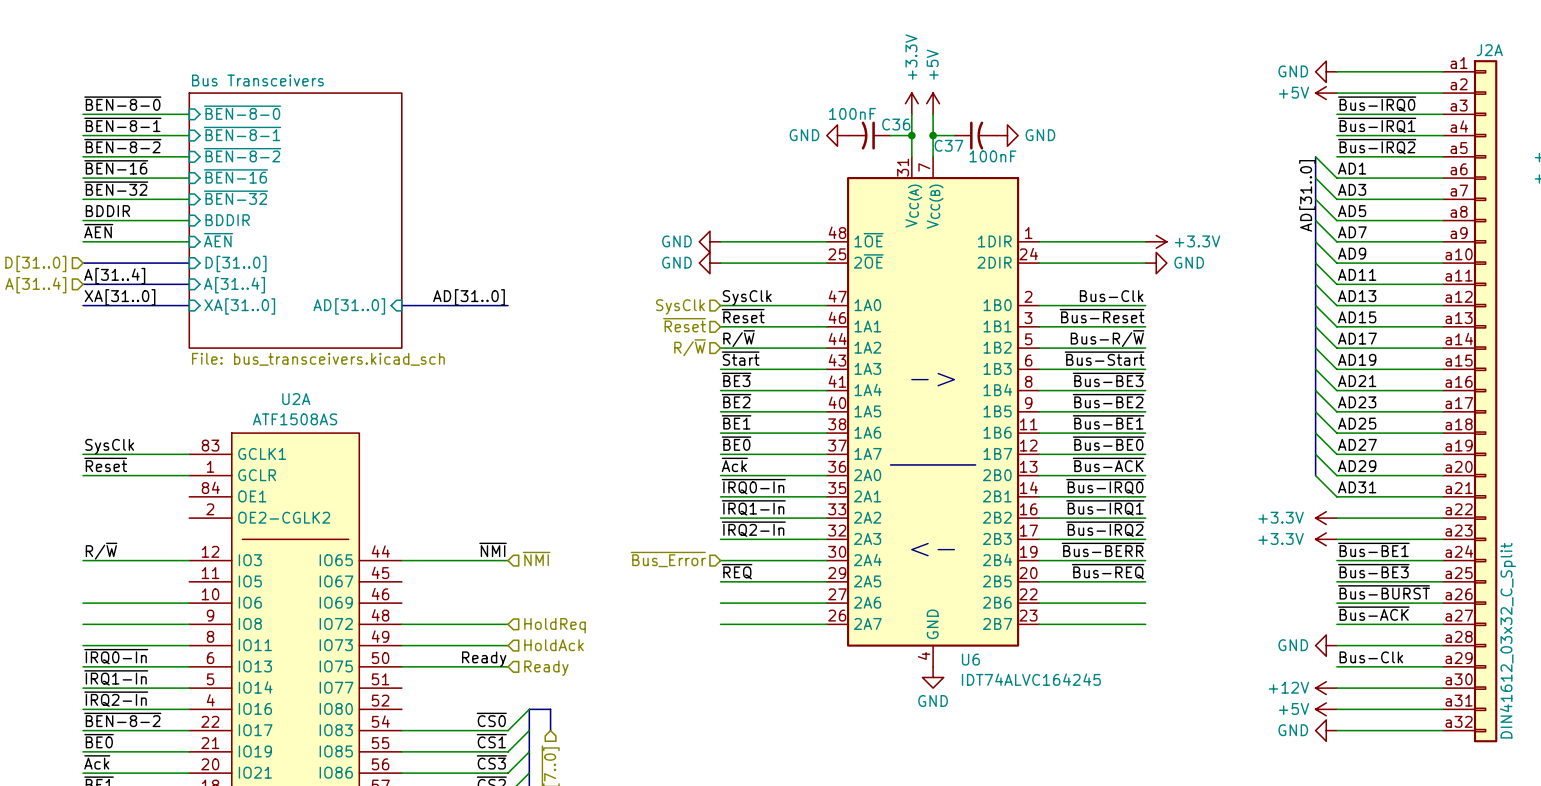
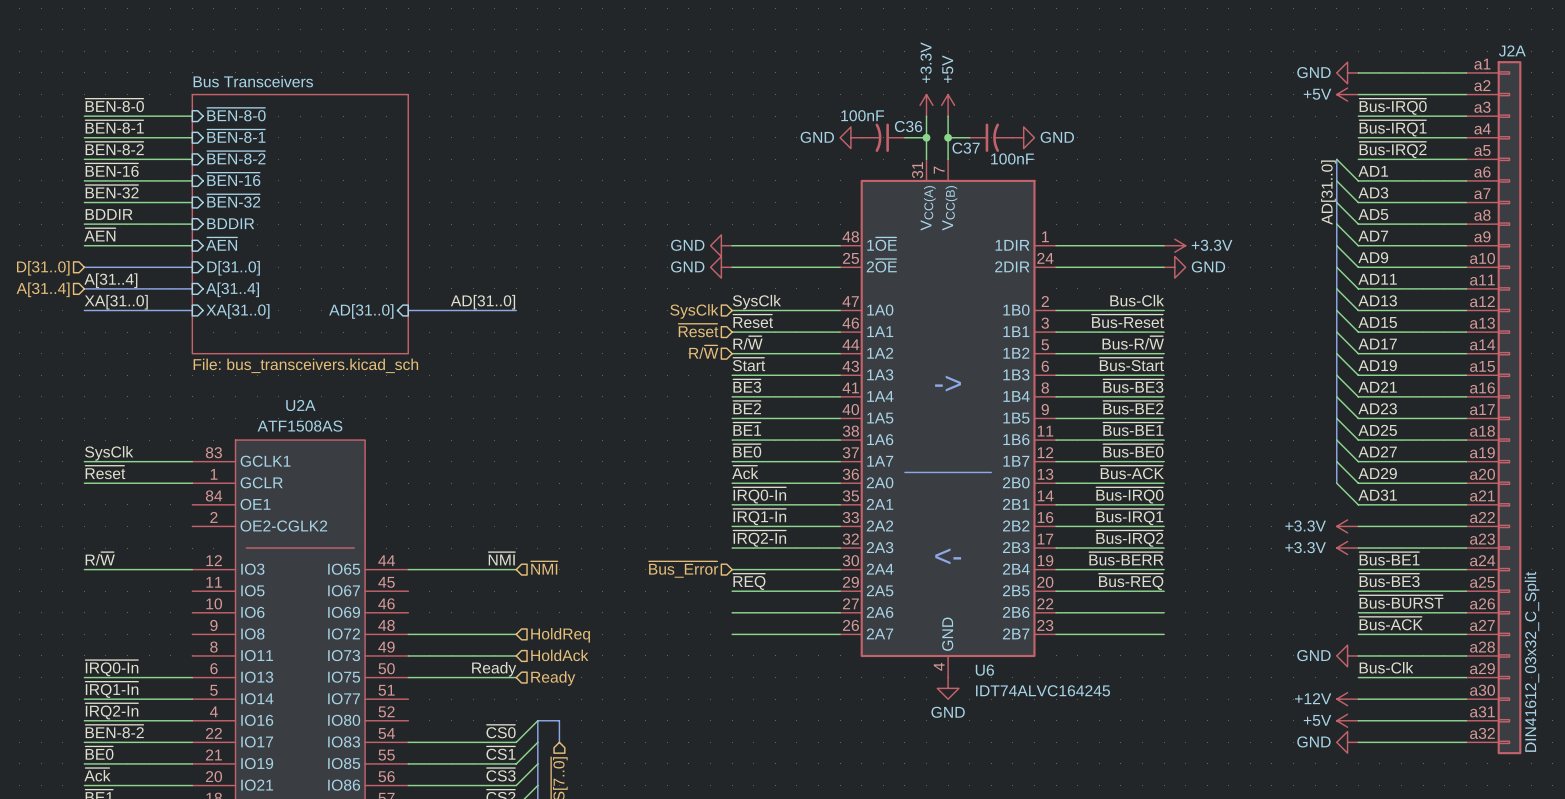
wire: (83, 603) (189, 603) -> none
wire: (83, 624) (189, 624) -> none
wire: (83, 645) (189, 645) -> none

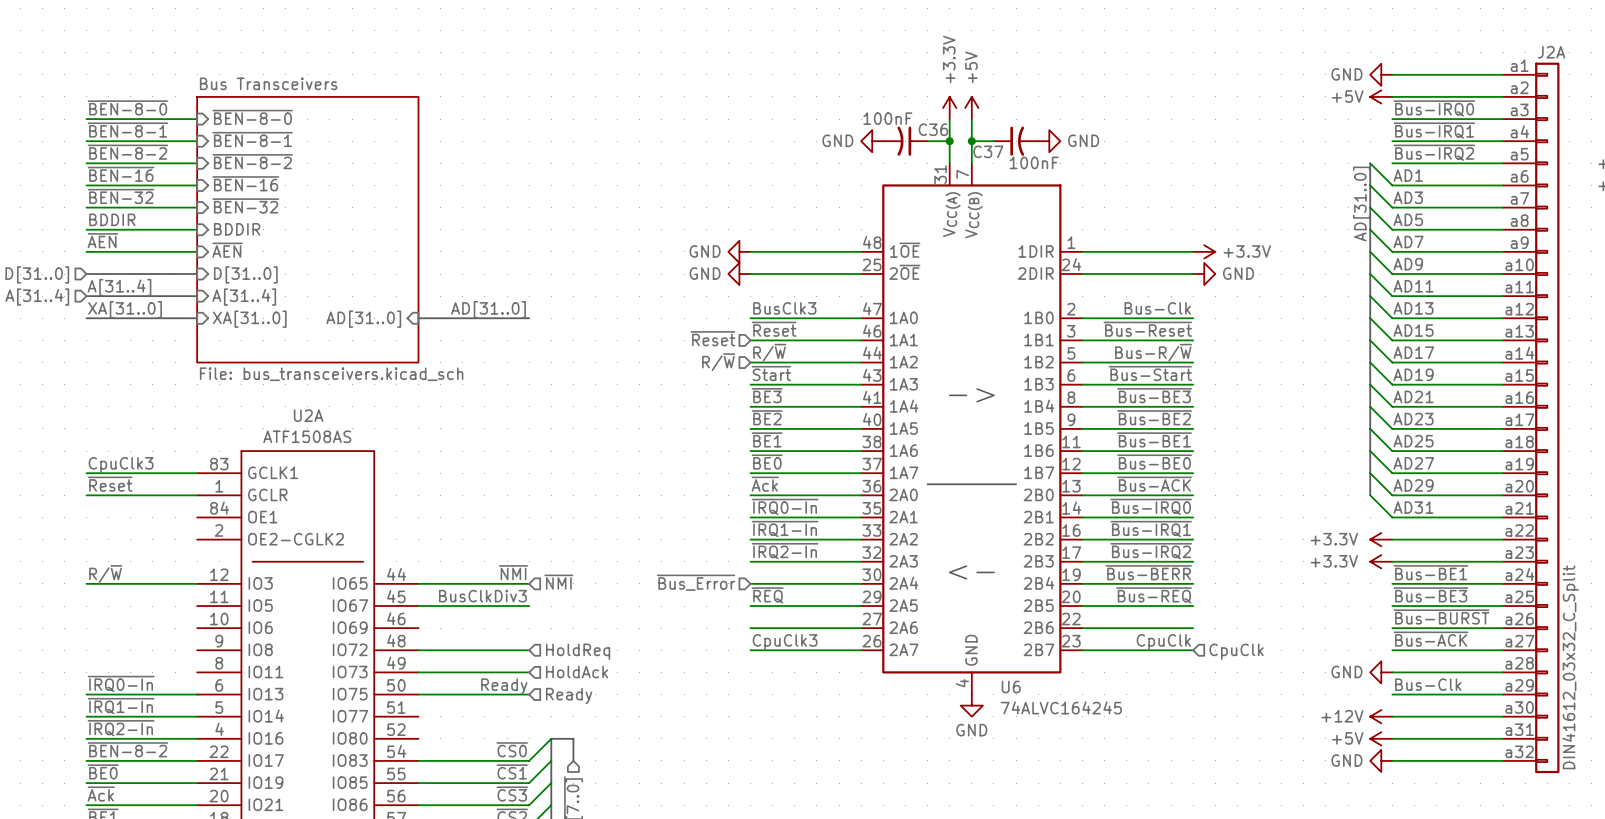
label: SysClk (756, 302) -> BusClk3 (784, 308)
hierarchical label: SysClk (694, 311) -> none
label: SysClk (109, 453) -> CpuClk3 (121, 465)
label: none -> BusClkDiv3 (482, 596)
wire: none -> (418, 606) (529, 606)
label: none -> CpuClk3 (785, 642)
label: none -> CpuClk (1163, 642)
hierarchical label: none -> CpuClk (1236, 651)
U6 value: IDT74ALVC164245 (1043, 690) -> 74ALVC164245 (1061, 707)

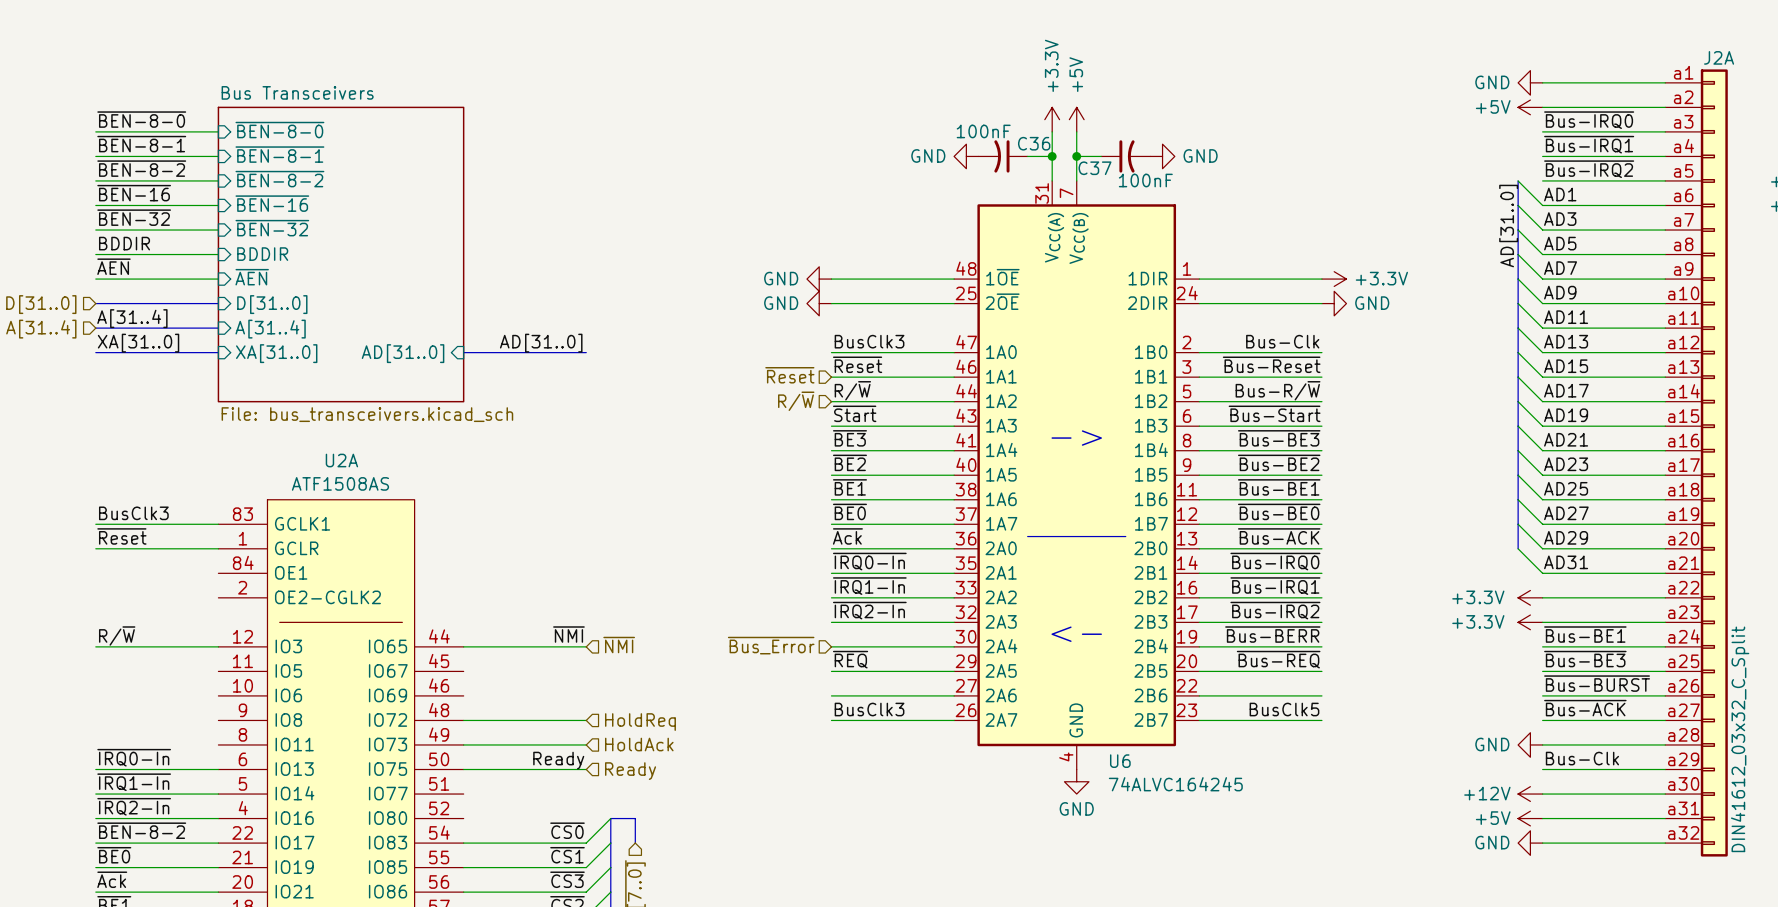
label: CpuClk3 (121, 465) -> BusClk3 (133, 513)
label: BusClkDiv3 (482, 596) -> none
wire: (418, 606) (529, 606) -> none
label: CpuClk3 (785, 642) -> BusClk3 (869, 709)
label: CpuClk (1163, 642) -> BusClk5 (1284, 709)
hierarchical label: CpuClk (1236, 651) -> none

